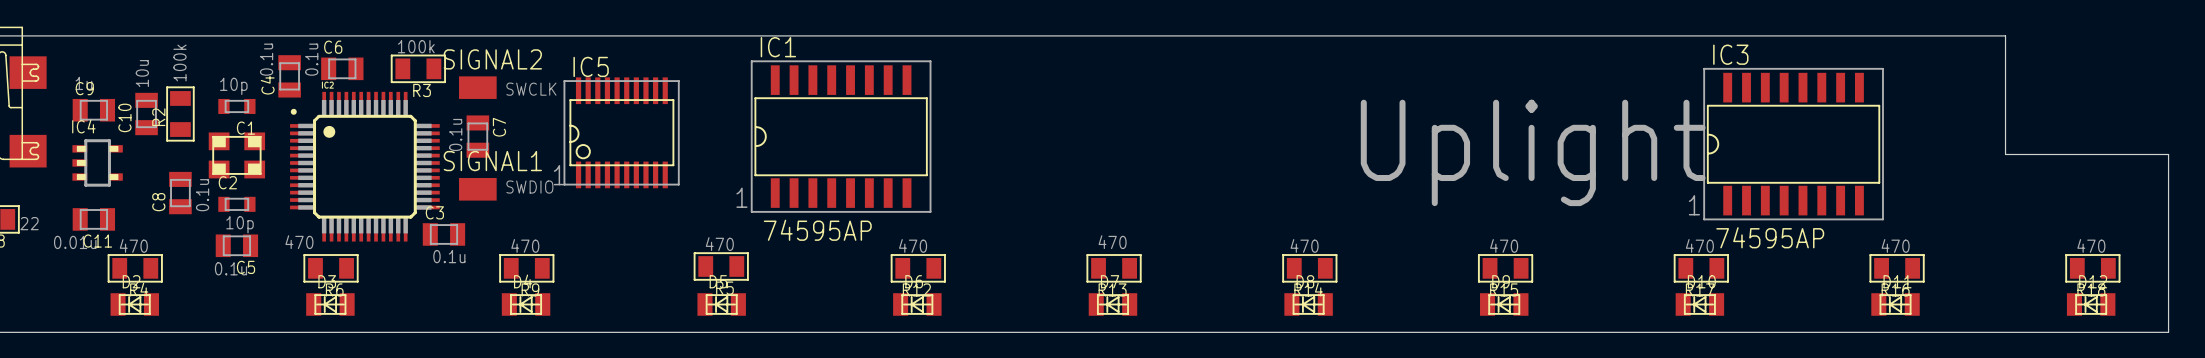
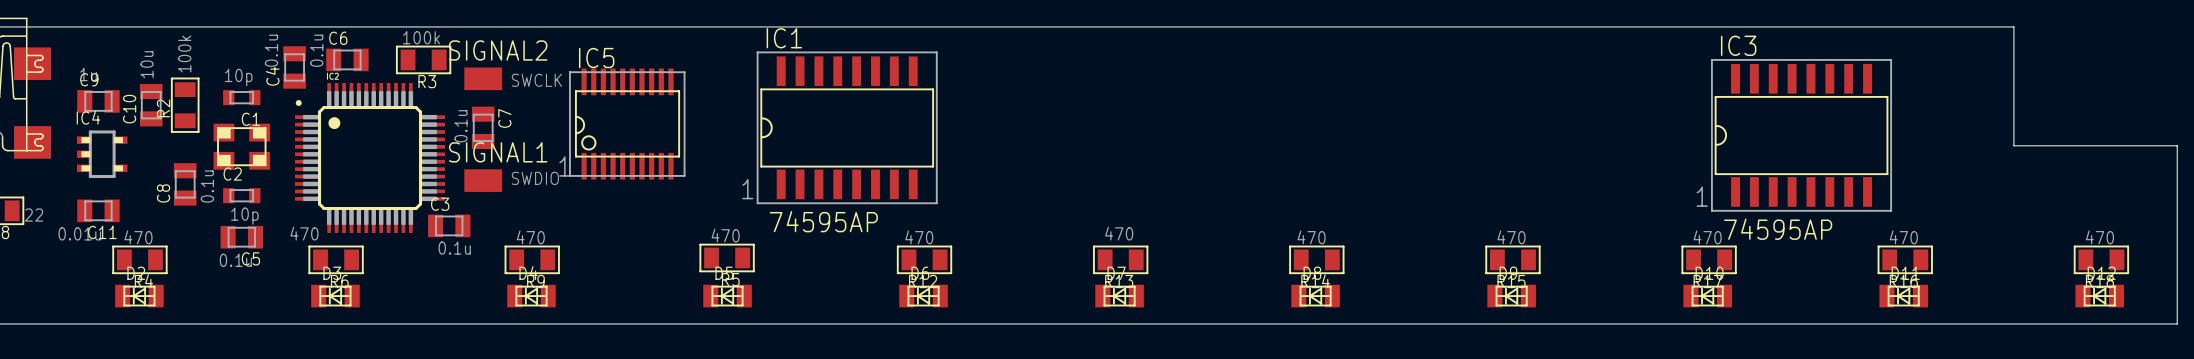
text: Uplight (1533, 152) -> none

